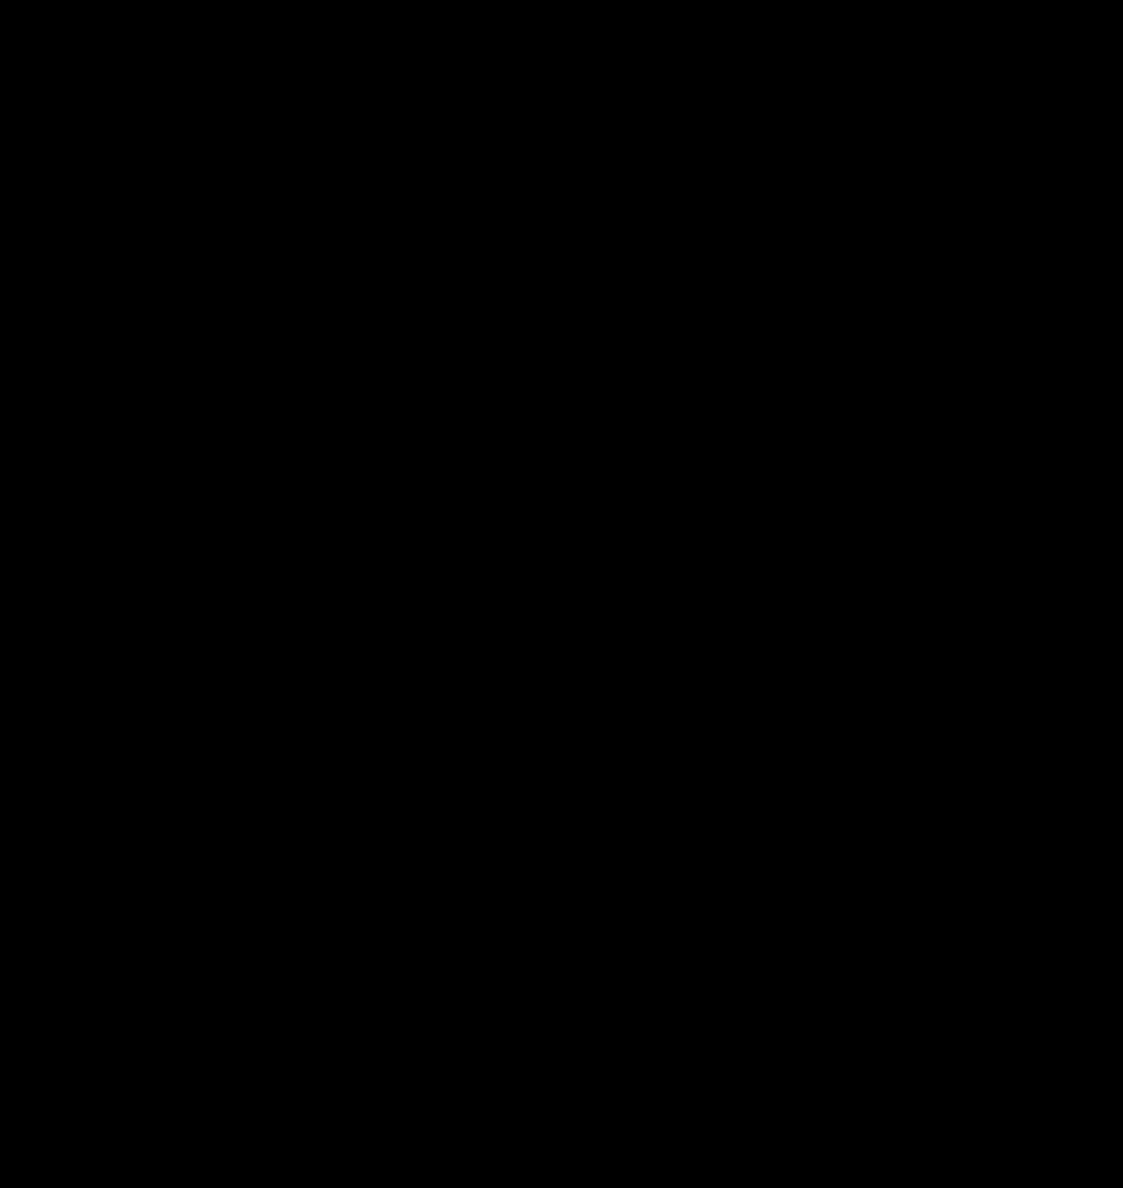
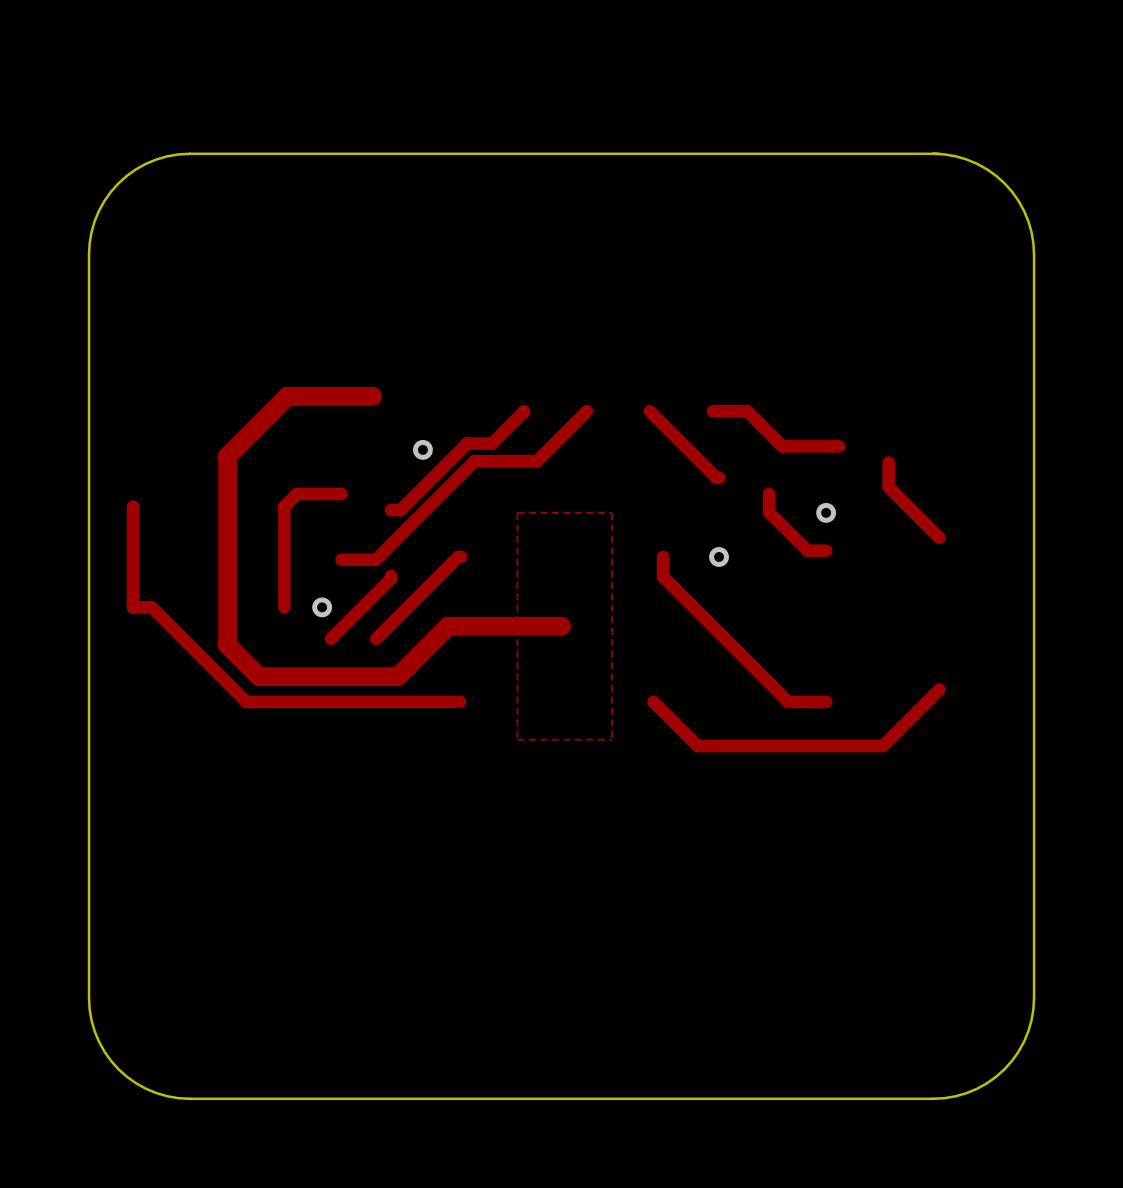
board edge: none -> (933, 153) (944, 154) (955, 156) (976, 163) (1004, 183) (1024, 210) (1033, 243) (1034, 997) (1028, 1031) (1012, 1060) (996, 1076) (976, 1088) (955, 1096) (933, 1098) (189, 1098) (156, 1093) (126, 1076) (111, 1060) (99, 1041) (91, 1020) (89, 997) (89, 254) (94, 221) (111, 191) (126, 175) (146, 163) (167, 156) (189, 153) (939, 153)
top track: none -> (372, 396) (287, 396) (227, 456) (227, 645) (259, 676) (397, 676) (448, 626) (561, 626)
top track: none -> (523, 411) (492, 443) (467, 443) (400, 510) (391, 510)
top track: none -> (586, 411) (536, 461) (474, 461) (376, 559) (341, 559)
top track: none -> (649, 411) (716, 477) (719, 477)
top track: none -> (712, 411) (747, 411) (782, 446) (839, 446)
via: none -> (422, 449)
top track: none -> (888, 462) (888, 487) (939, 538)
top track: none -> (341, 493) (296, 493) (284, 506) (284, 607)
top track: none -> (769, 493) (769, 512) (807, 550) (826, 550)
top track: none -> (133, 506) (133, 607) (151, 607) (246, 701) (459, 701)
top zone outline: none -> (517, 512) (517, 739) (611, 739) (611, 512) (517, 512)
via: none -> (826, 512)
top track: none -> (461, 556) (458, 556) (376, 638)
top track: none -> (663, 556) (663, 576) (788, 701) (826, 701)
via: none -> (719, 556)
top track: none -> (391, 575) (391, 578) (330, 638)
via: none -> (322, 607)
top track: none -> (939, 689) (882, 745) (697, 745) (653, 701)

